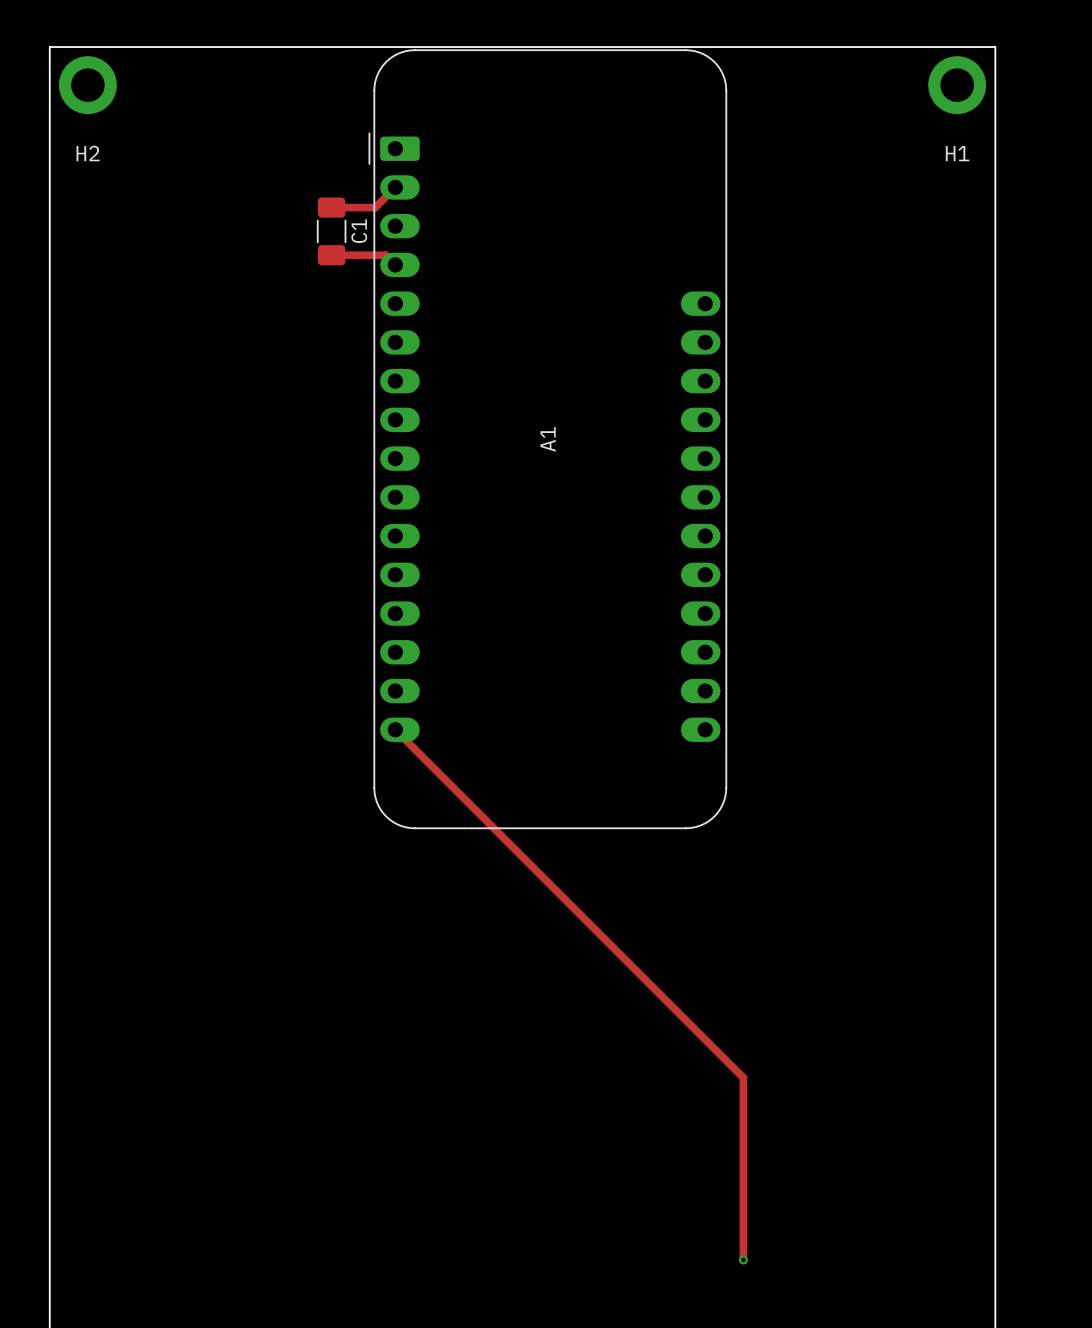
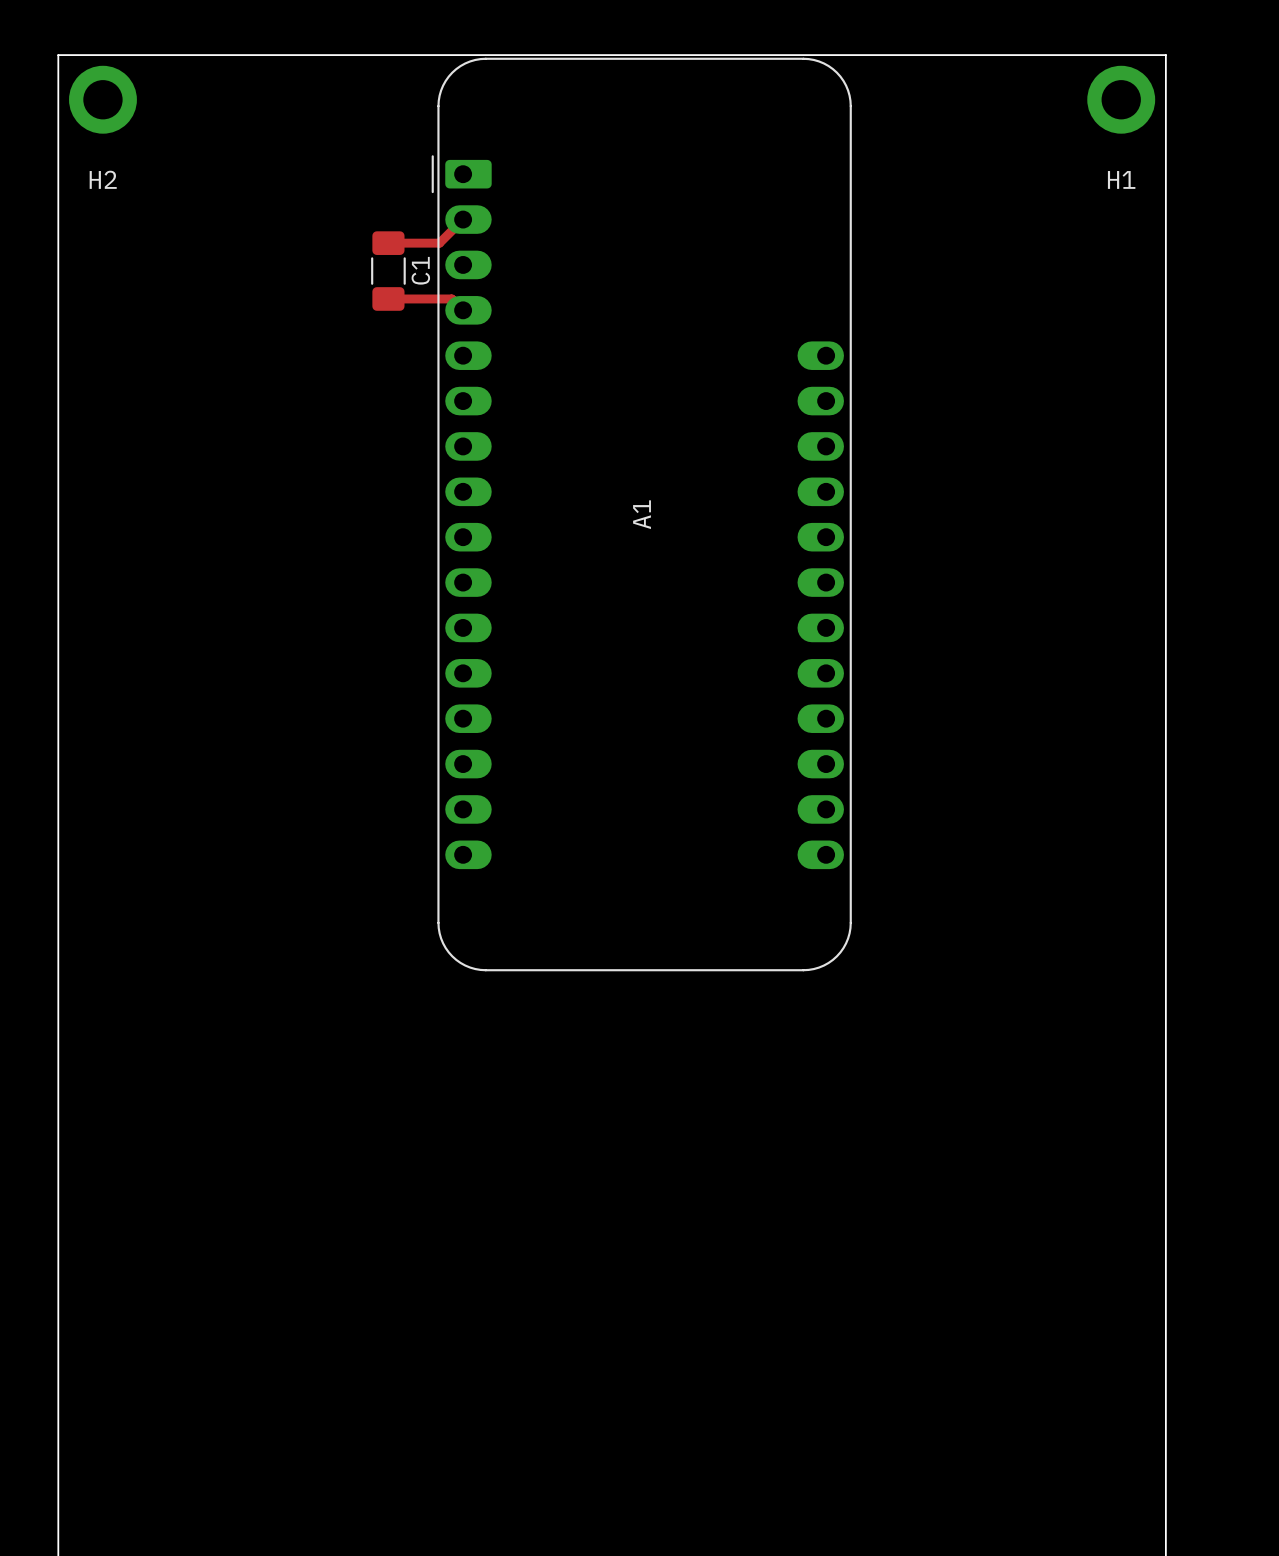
track: (395, 729) (743, 1077) (743, 1259) -> none
via: (743, 1259) -> none

